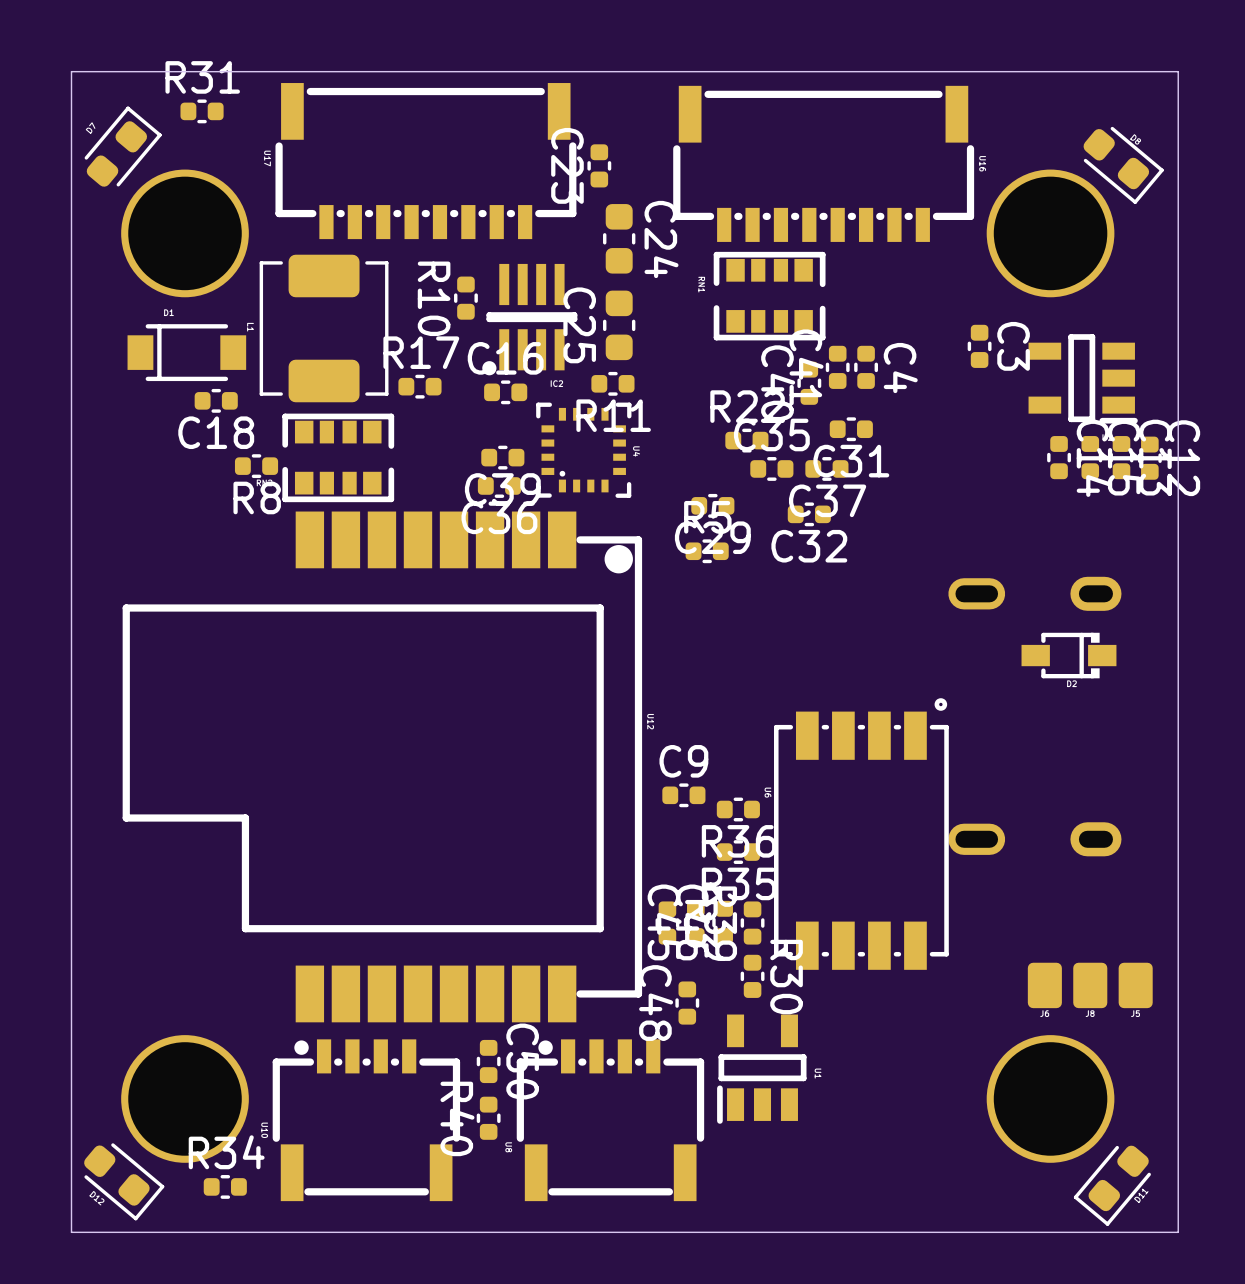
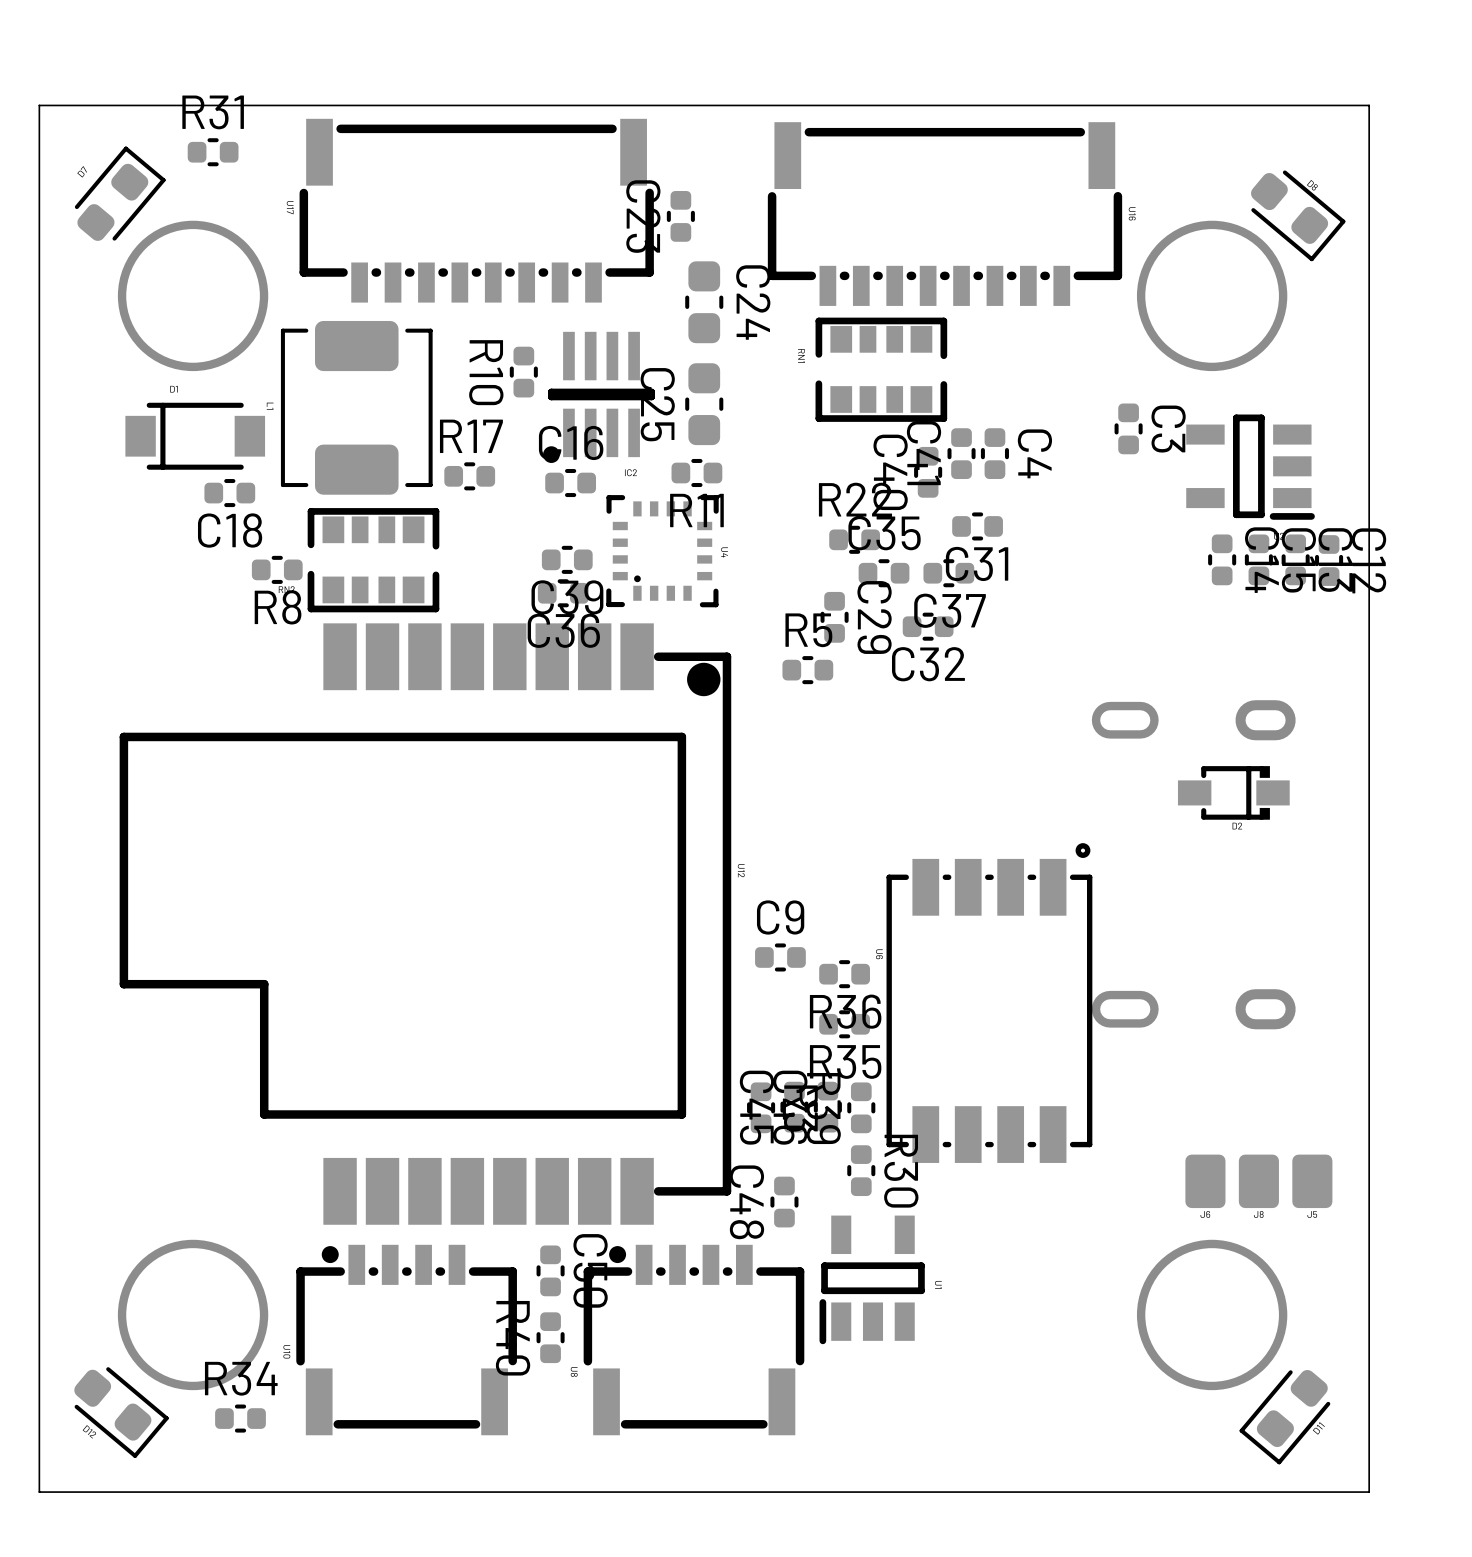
board edge: (1178, 71) (1178, 1232) (71, 1232) (71, 71) -> (1362, 105) (1369, 105) (1369, 1492) (39, 1492) (39, 105) (59, 105)
C29 rotation: 0° (712, 505) -> 90° clockwise (834, 617)

